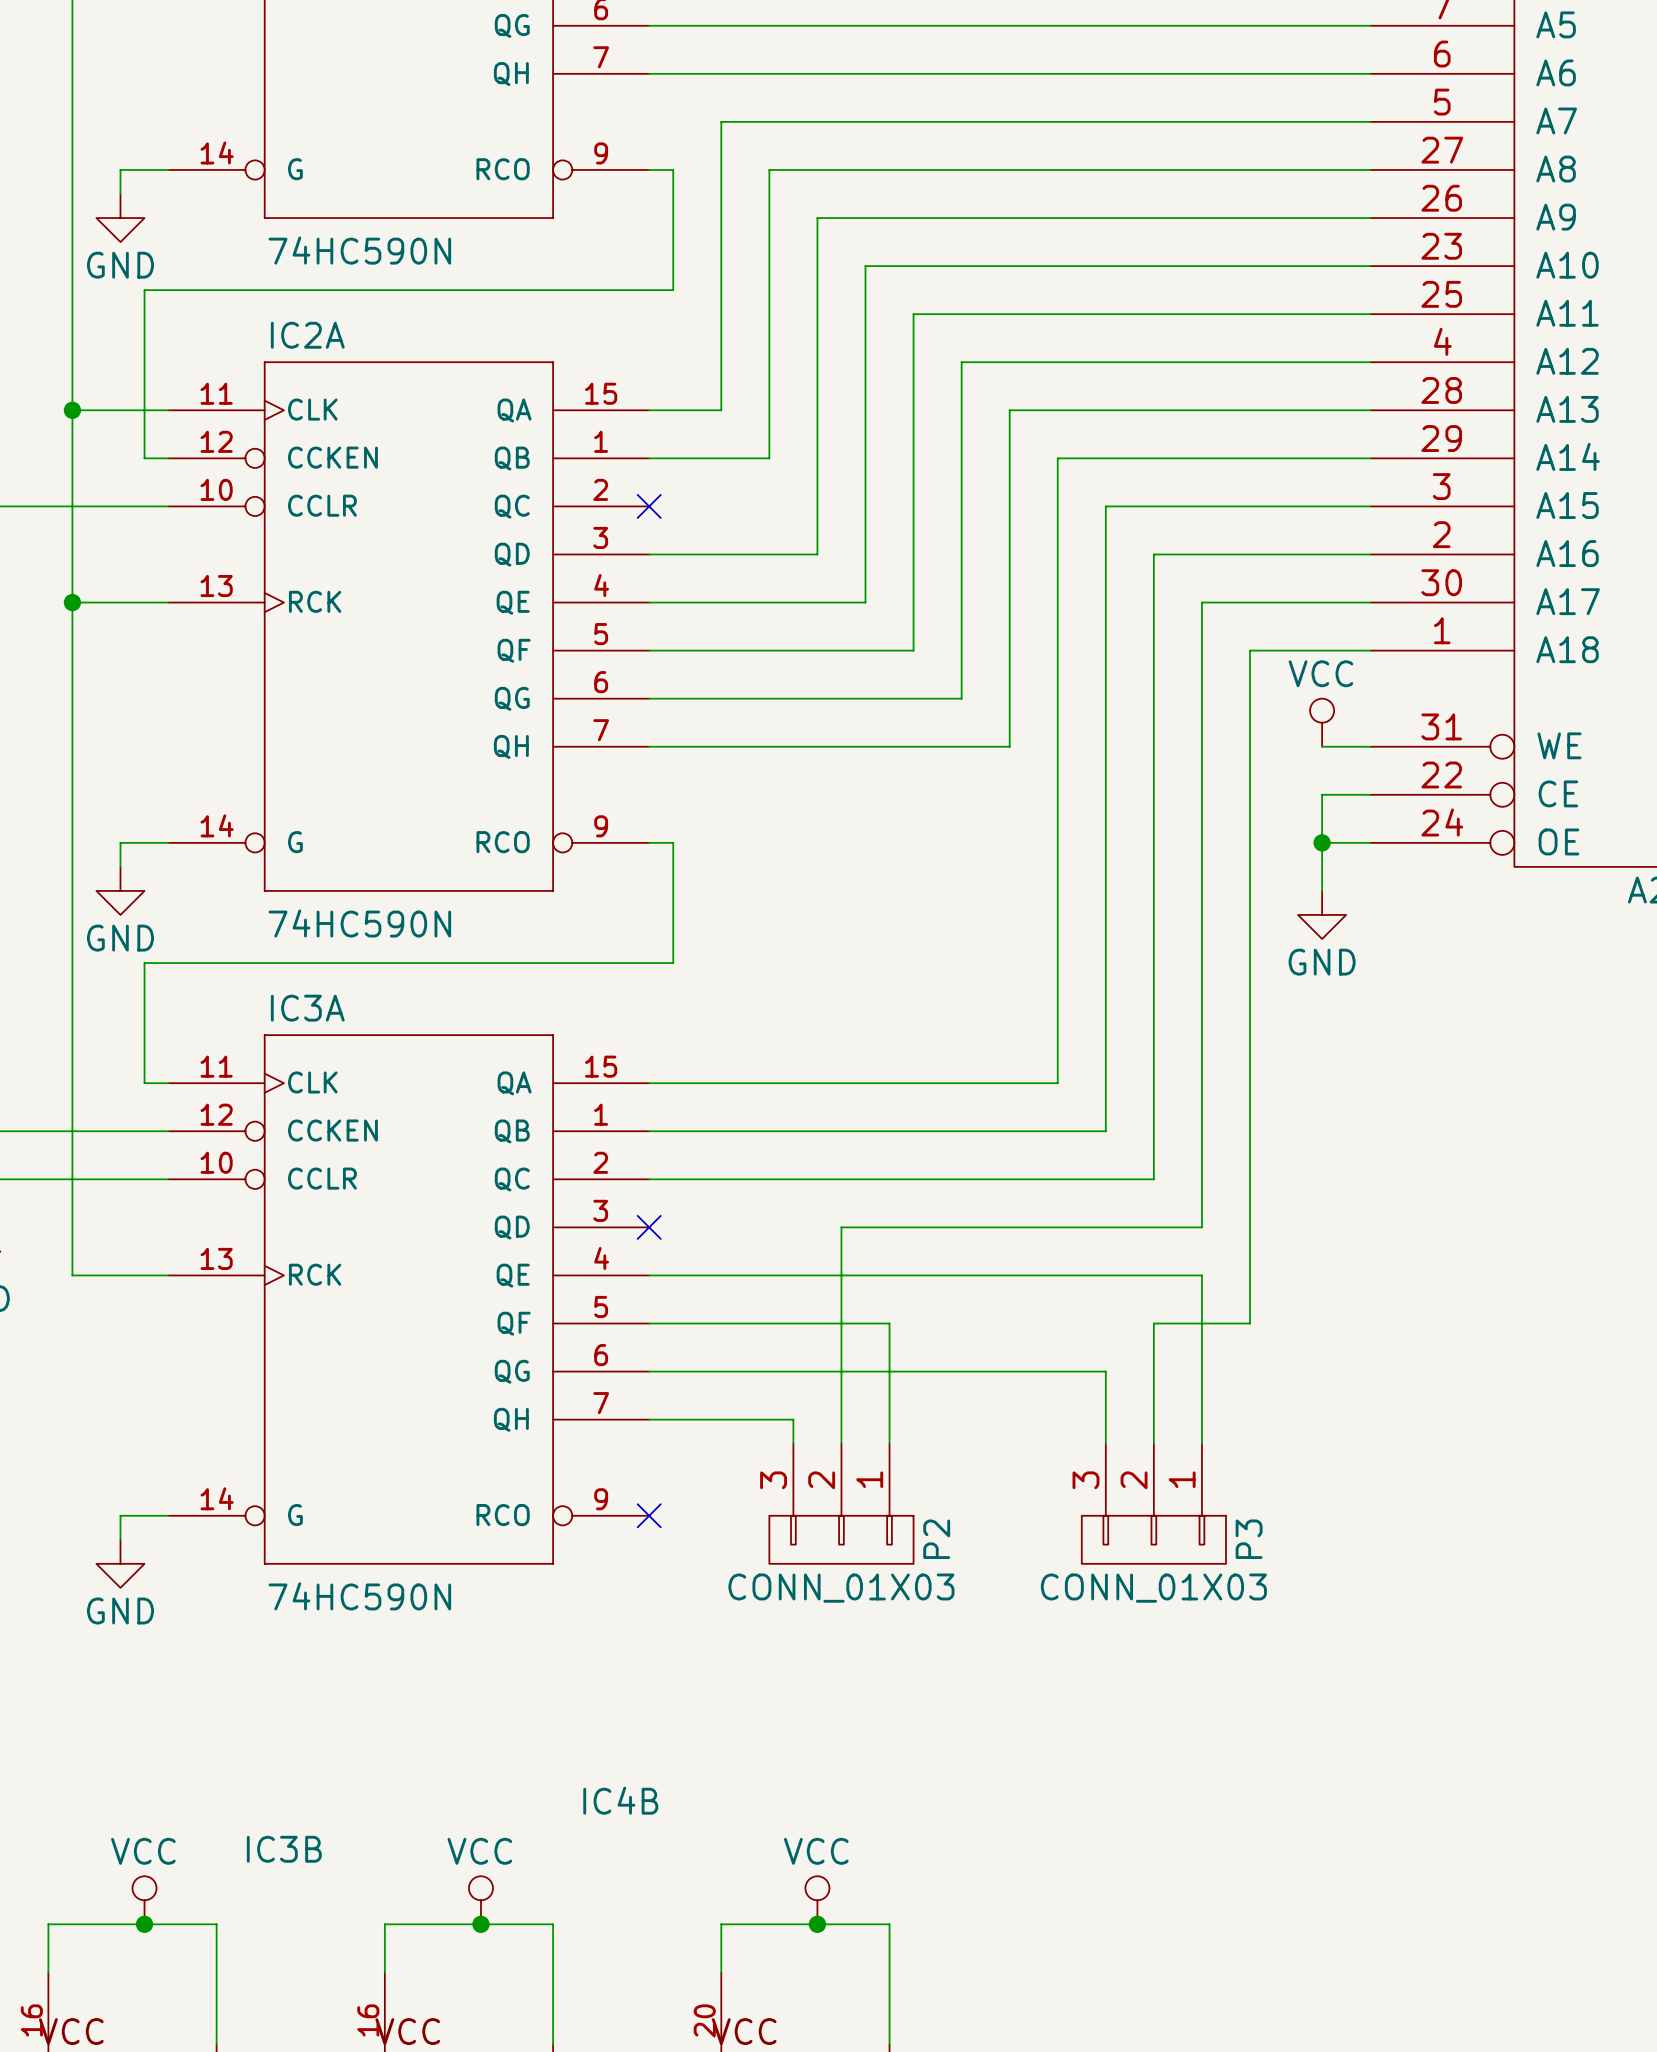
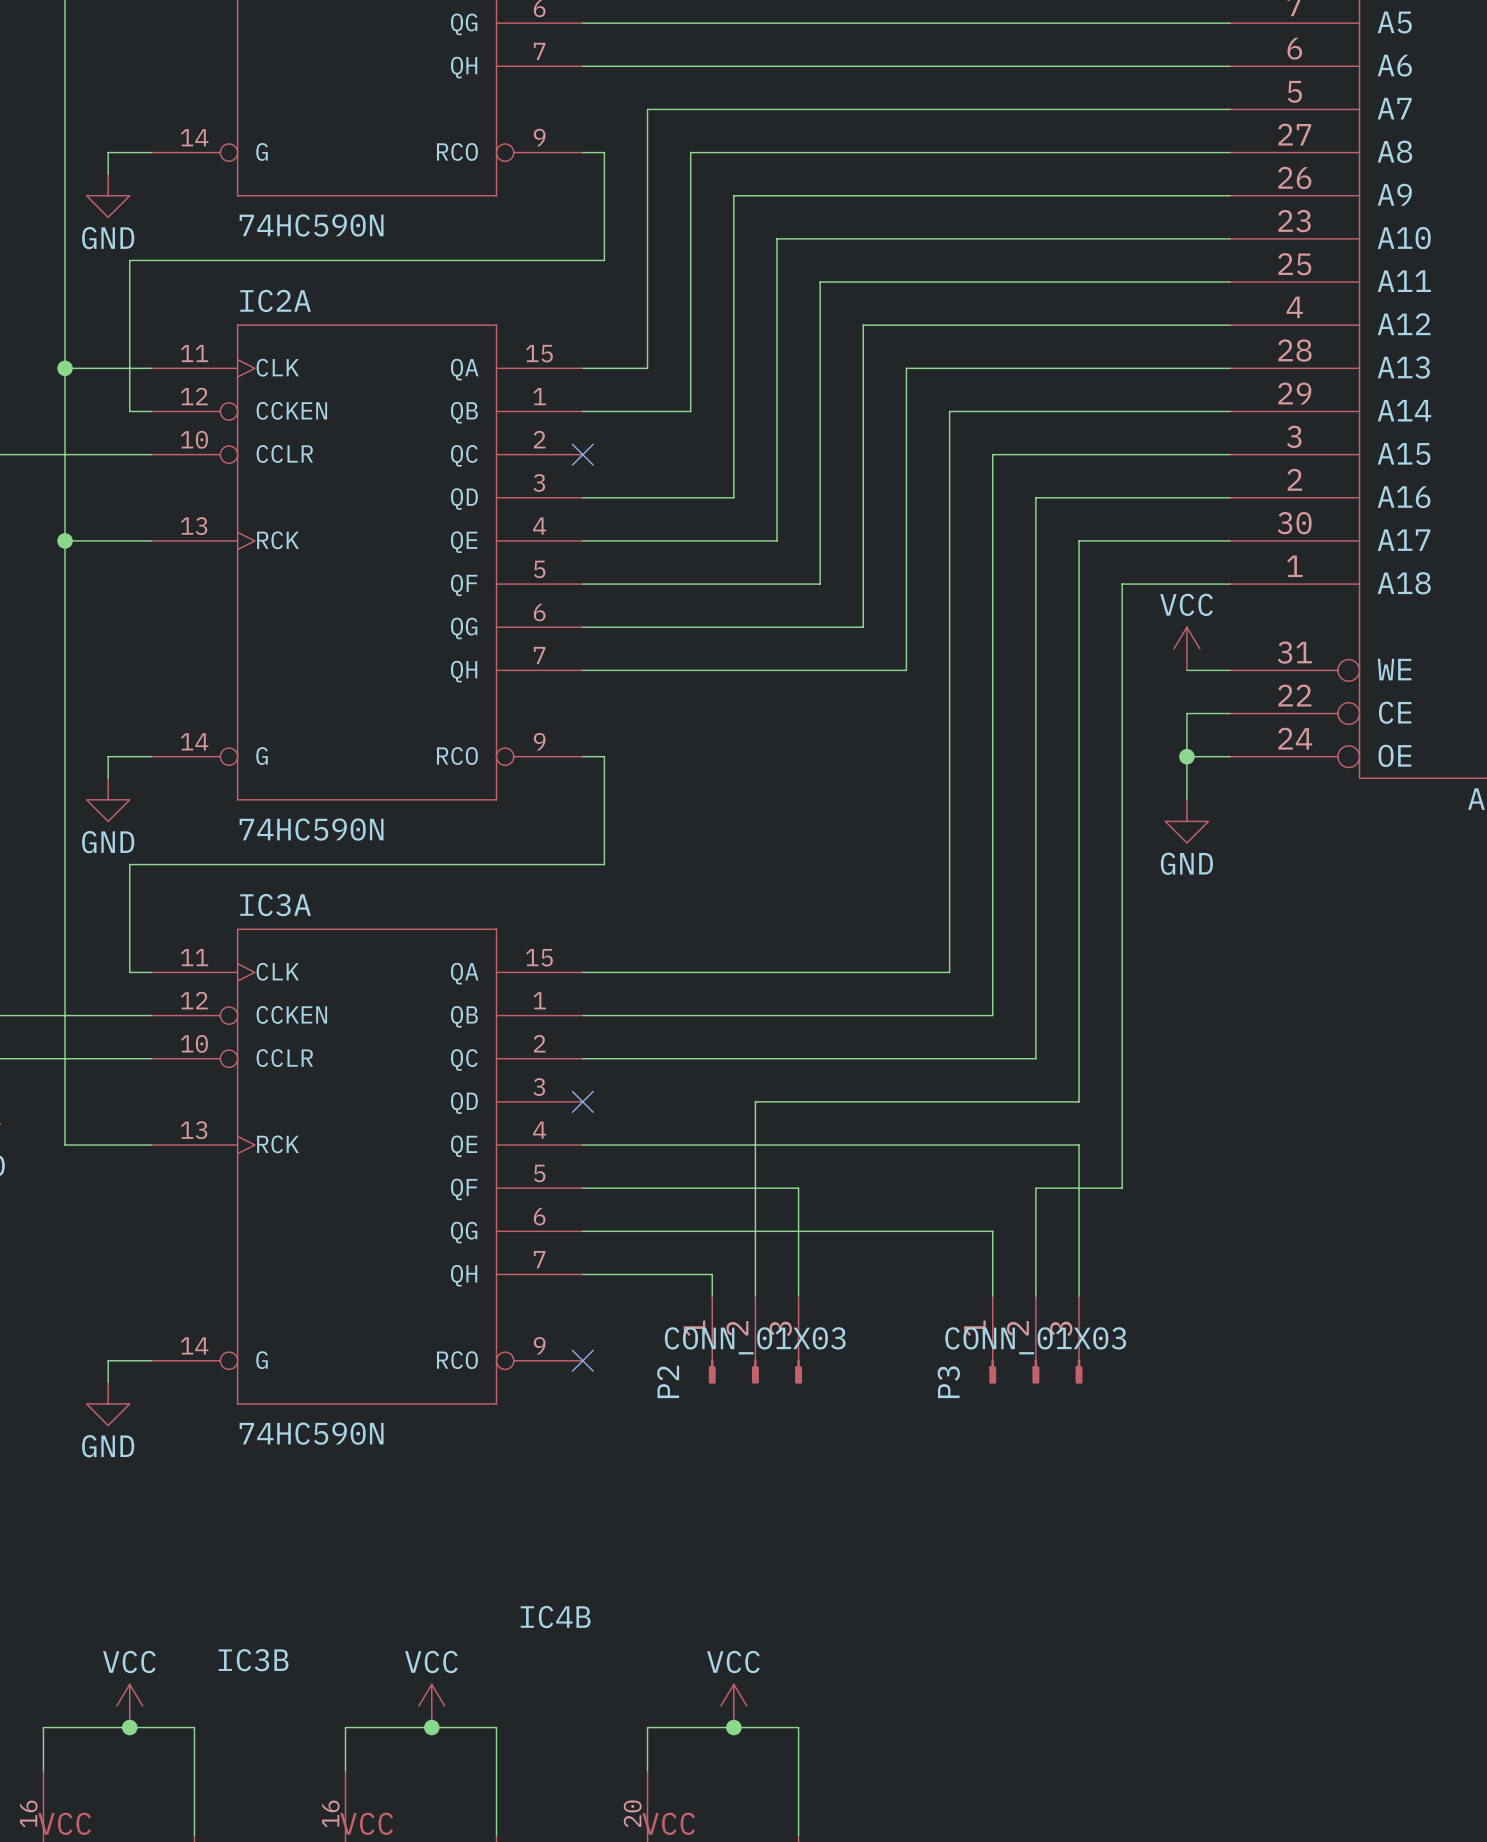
power symbol shape: [1310, 698, 1335, 747] -> [1173, 627, 1200, 671]
P2 symbol: [769, 1443, 914, 1564] -> [708, 1296, 803, 1384]
P3 symbol: [1081, 1443, 1226, 1564] -> [989, 1296, 1083, 1384]
P2 name position: P2 (936, 1539) -> P2 (668, 1381)
P3 name position: P3 (1249, 1539) -> P3 (948, 1382)
P2 value position: CONN_01X03 (841, 1588) -> CONN_01X03 (755, 1340)
P3 value position: CONN_01X03 (1153, 1588) -> CONN_01X03 (1035, 1340)
power symbol shape: [132, 1876, 157, 1925] -> [116, 1684, 143, 1728]
power symbol shape: [468, 1876, 493, 1925] -> [418, 1684, 445, 1728]
power symbol shape: [805, 1876, 830, 1925] -> [720, 1684, 747, 1728]

